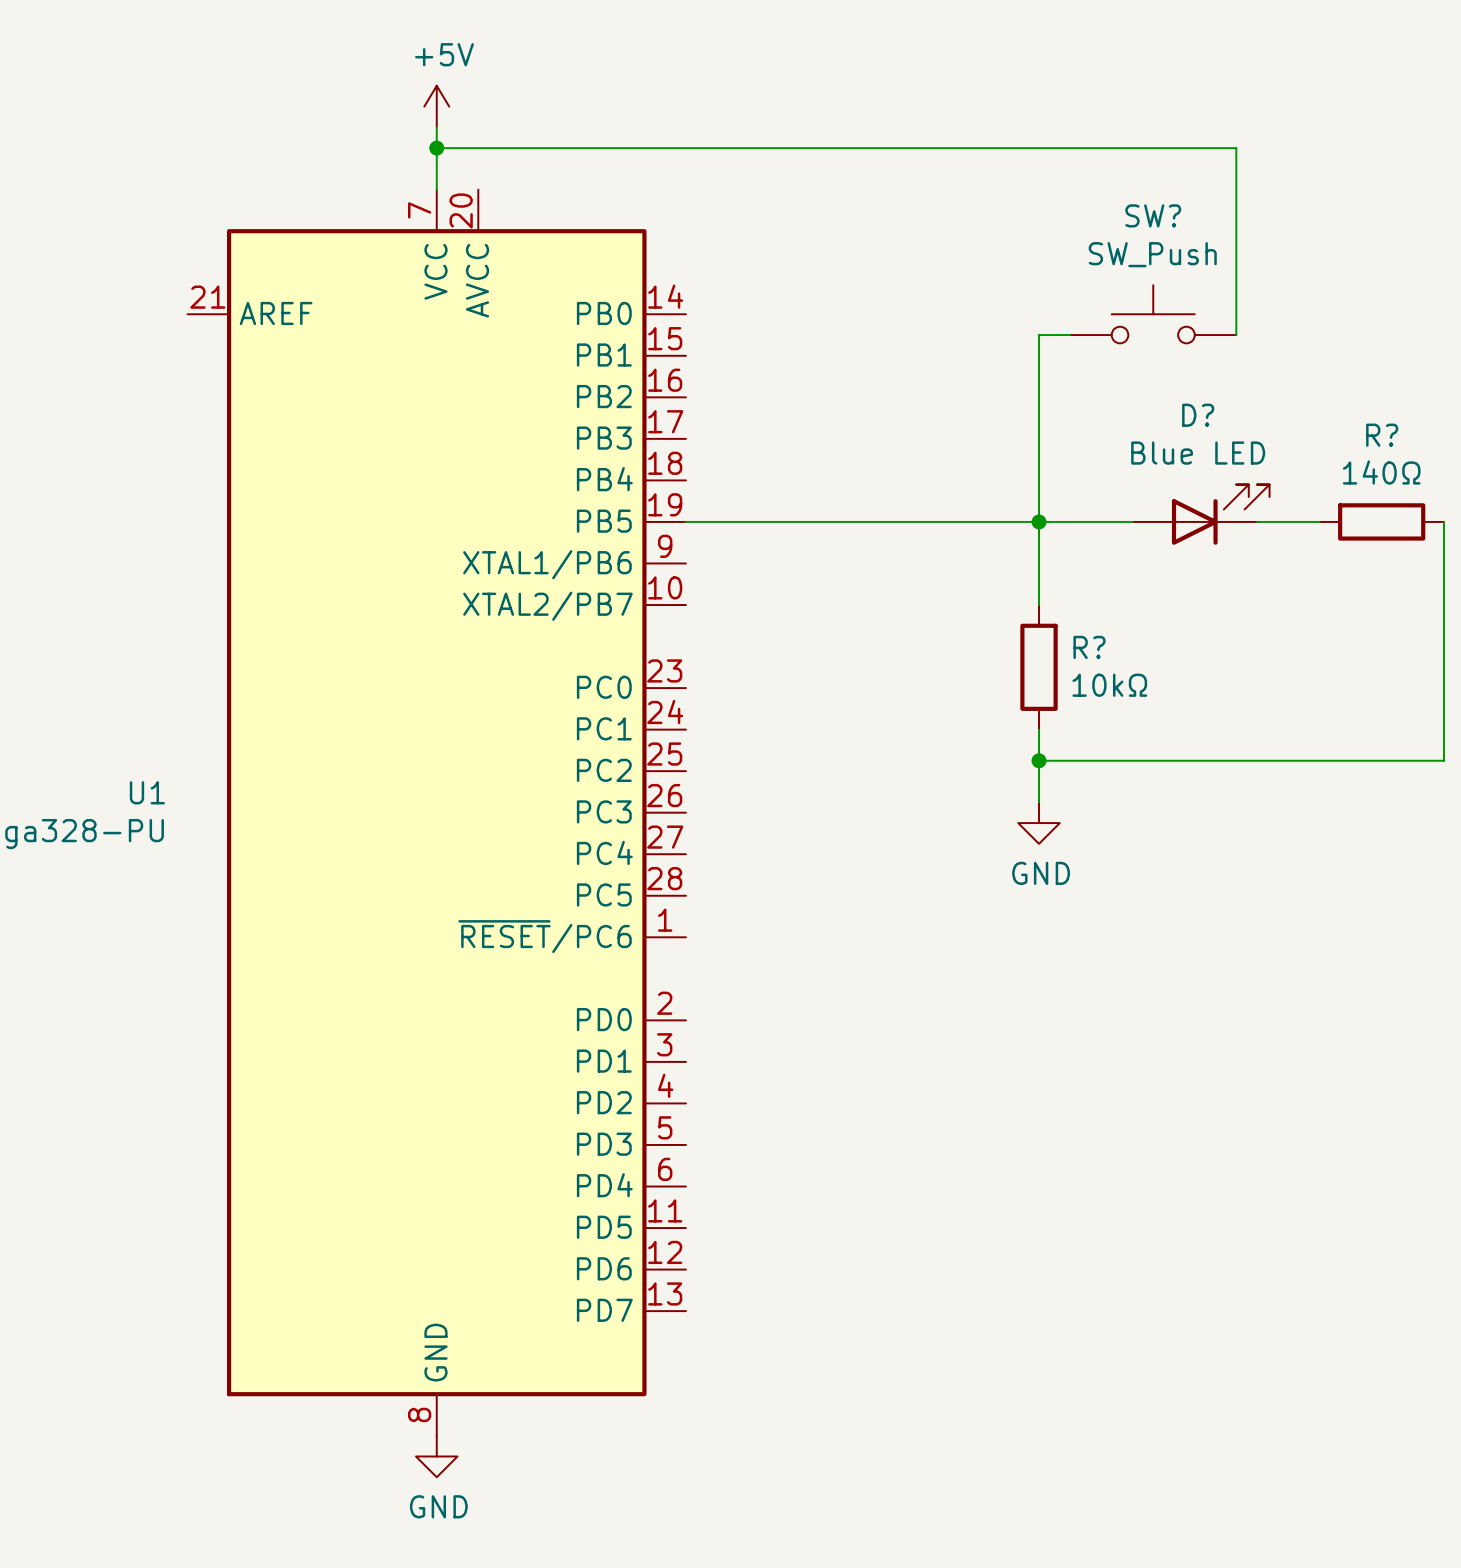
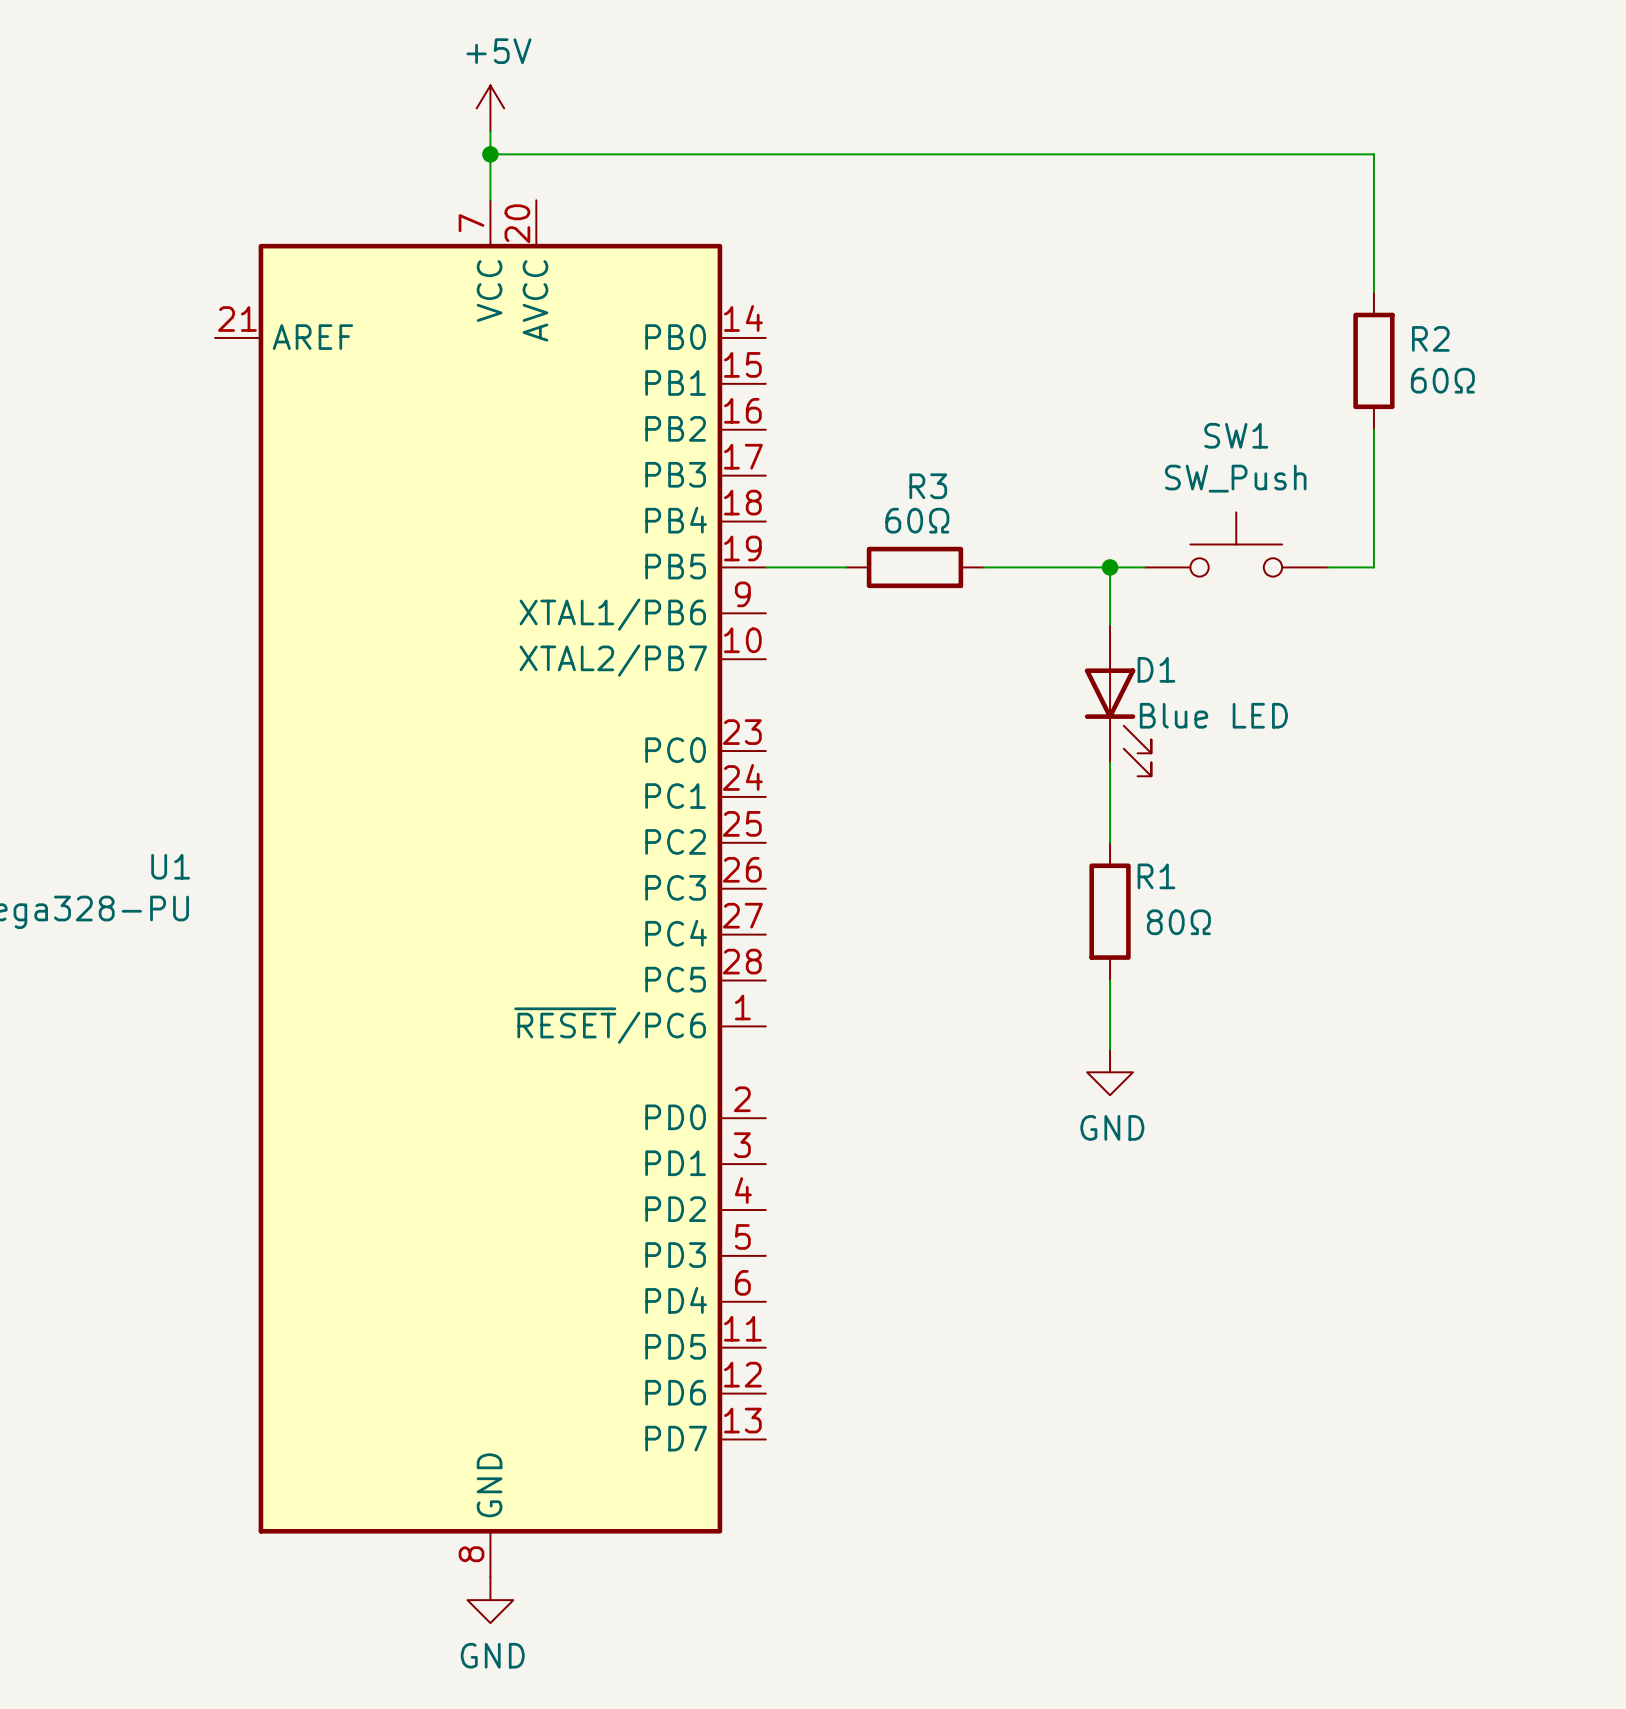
wire: (1236, 272) (1236, 335) -> none
SW?: SW_Push (1153, 314) -> none
wire: (1070, 335) (1039, 335) (1039, 605) -> none
R2: none -> 60Ω (1373, 360)
wire: none -> (1373, 429) (1373, 567) (1328, 567)
SW1: none -> SW_Push (1236, 544)
D?: Blue LED (1201, 514) -> none
wire: (758, 521) (883, 521) -> none
R3: none -> 60Ω (914, 567)
wire: none -> (1110, 567) (1110, 624)
wire: (1028, 521) (1132, 521) -> none
junction position: (1039, 521) -> (1110, 567)
wire: (1257, 521) (1319, 521) -> none
R?: 140Ω (1381, 521) -> none
wire: (1443, 521) (1443, 760) (1039, 760) -> none
D1: none -> Blue LED (1118, 700)
R?: 10kΩ (1039, 667) -> none
wire: (1039, 729) (1039, 802) -> (1110, 762) (1110, 842)
junction: (1039, 760) -> none
power symbol position: GND (1039, 823) -> GND (1110, 1072)
R1: none -> 80Ω (1110, 911)
wire: none -> (1110, 980) (1110, 1049)

